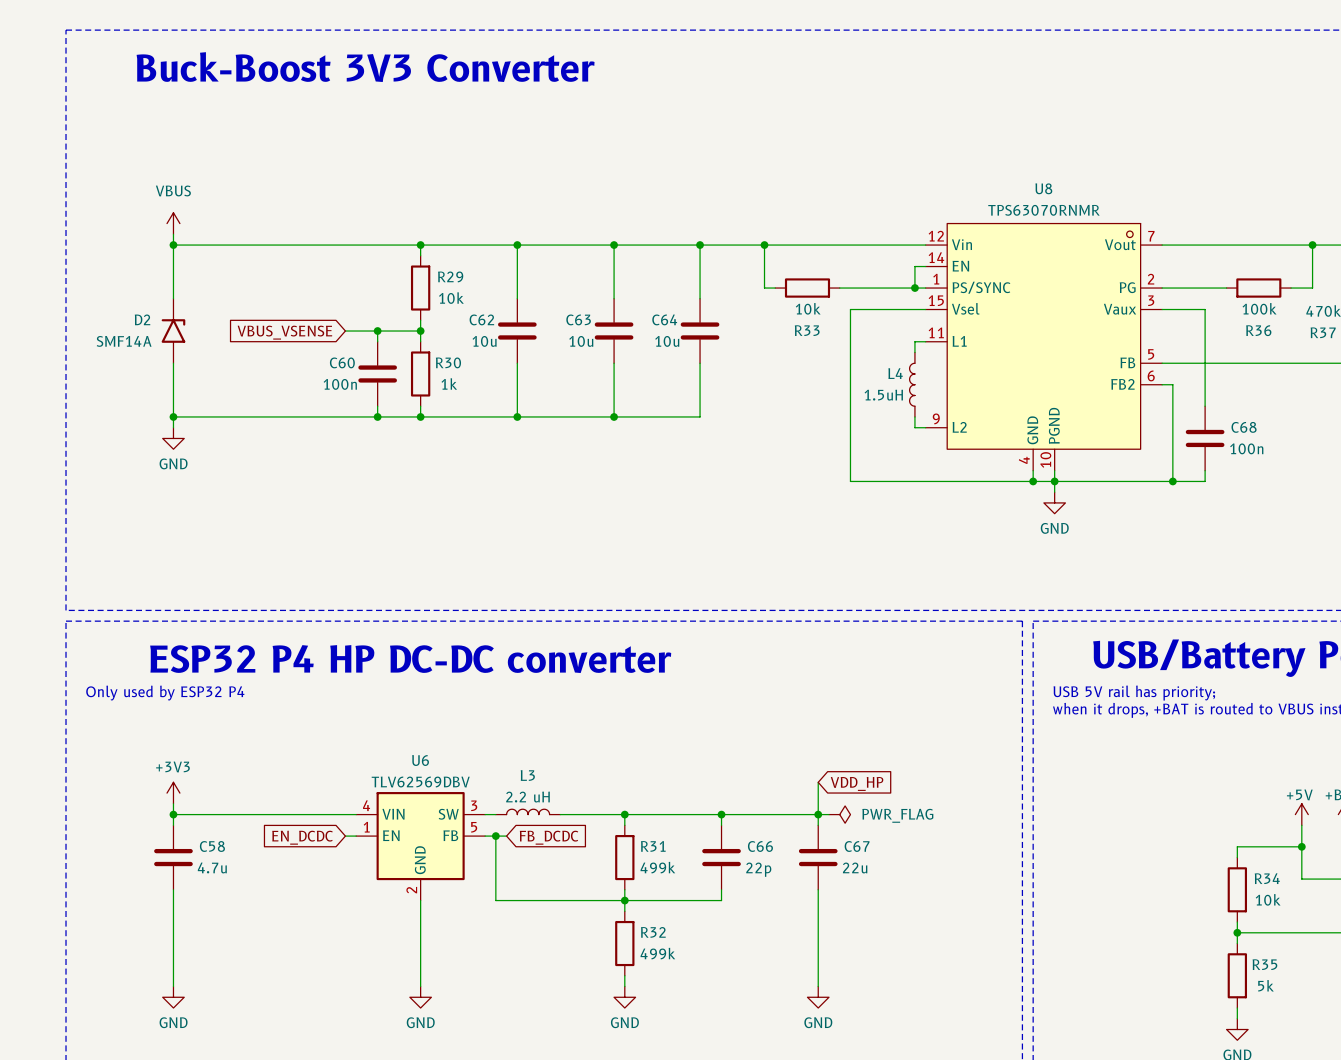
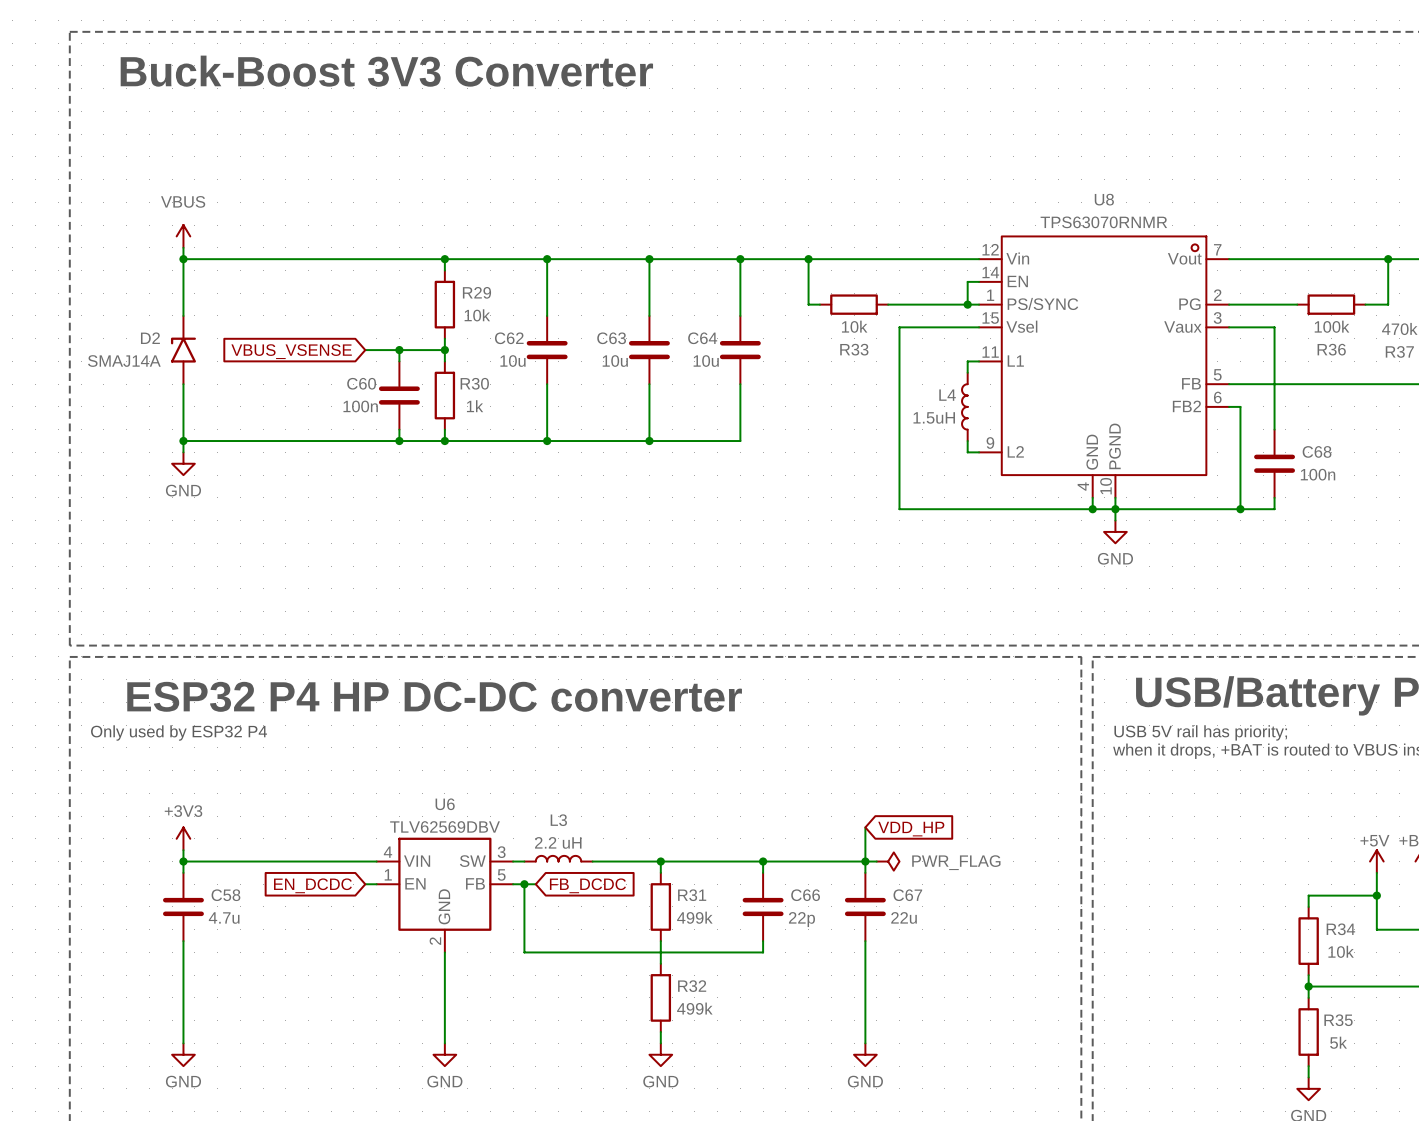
D2 flip: as is (173, 331) -> left-right (183, 350)
D2 value: SMF14A (124, 341) -> SMAJ14A (124, 361)
junction: (624, 900) -> none

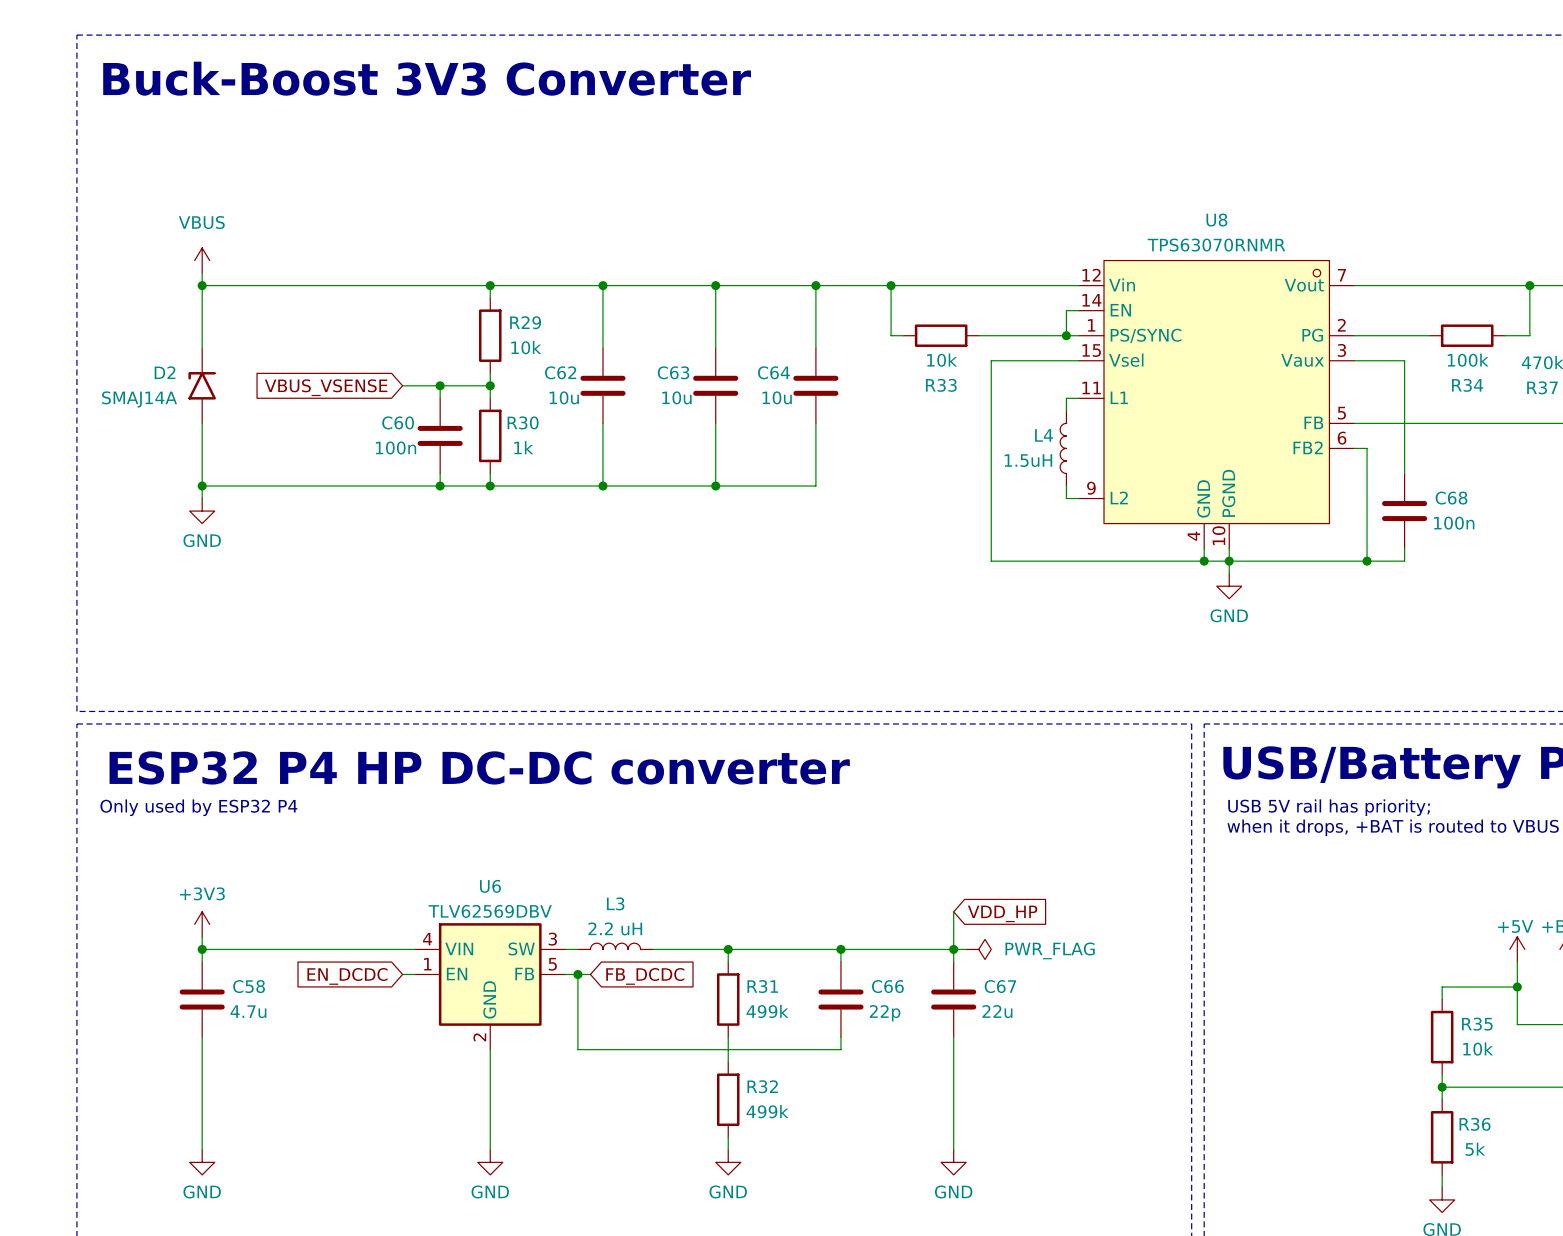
R36 name: R36 (1331, 349) -> R34 (1467, 385)
R34 name: R34 (1340, 929) -> R35 (1477, 1024)
R35 name: R35 (1338, 1020) -> R36 (1475, 1124)

